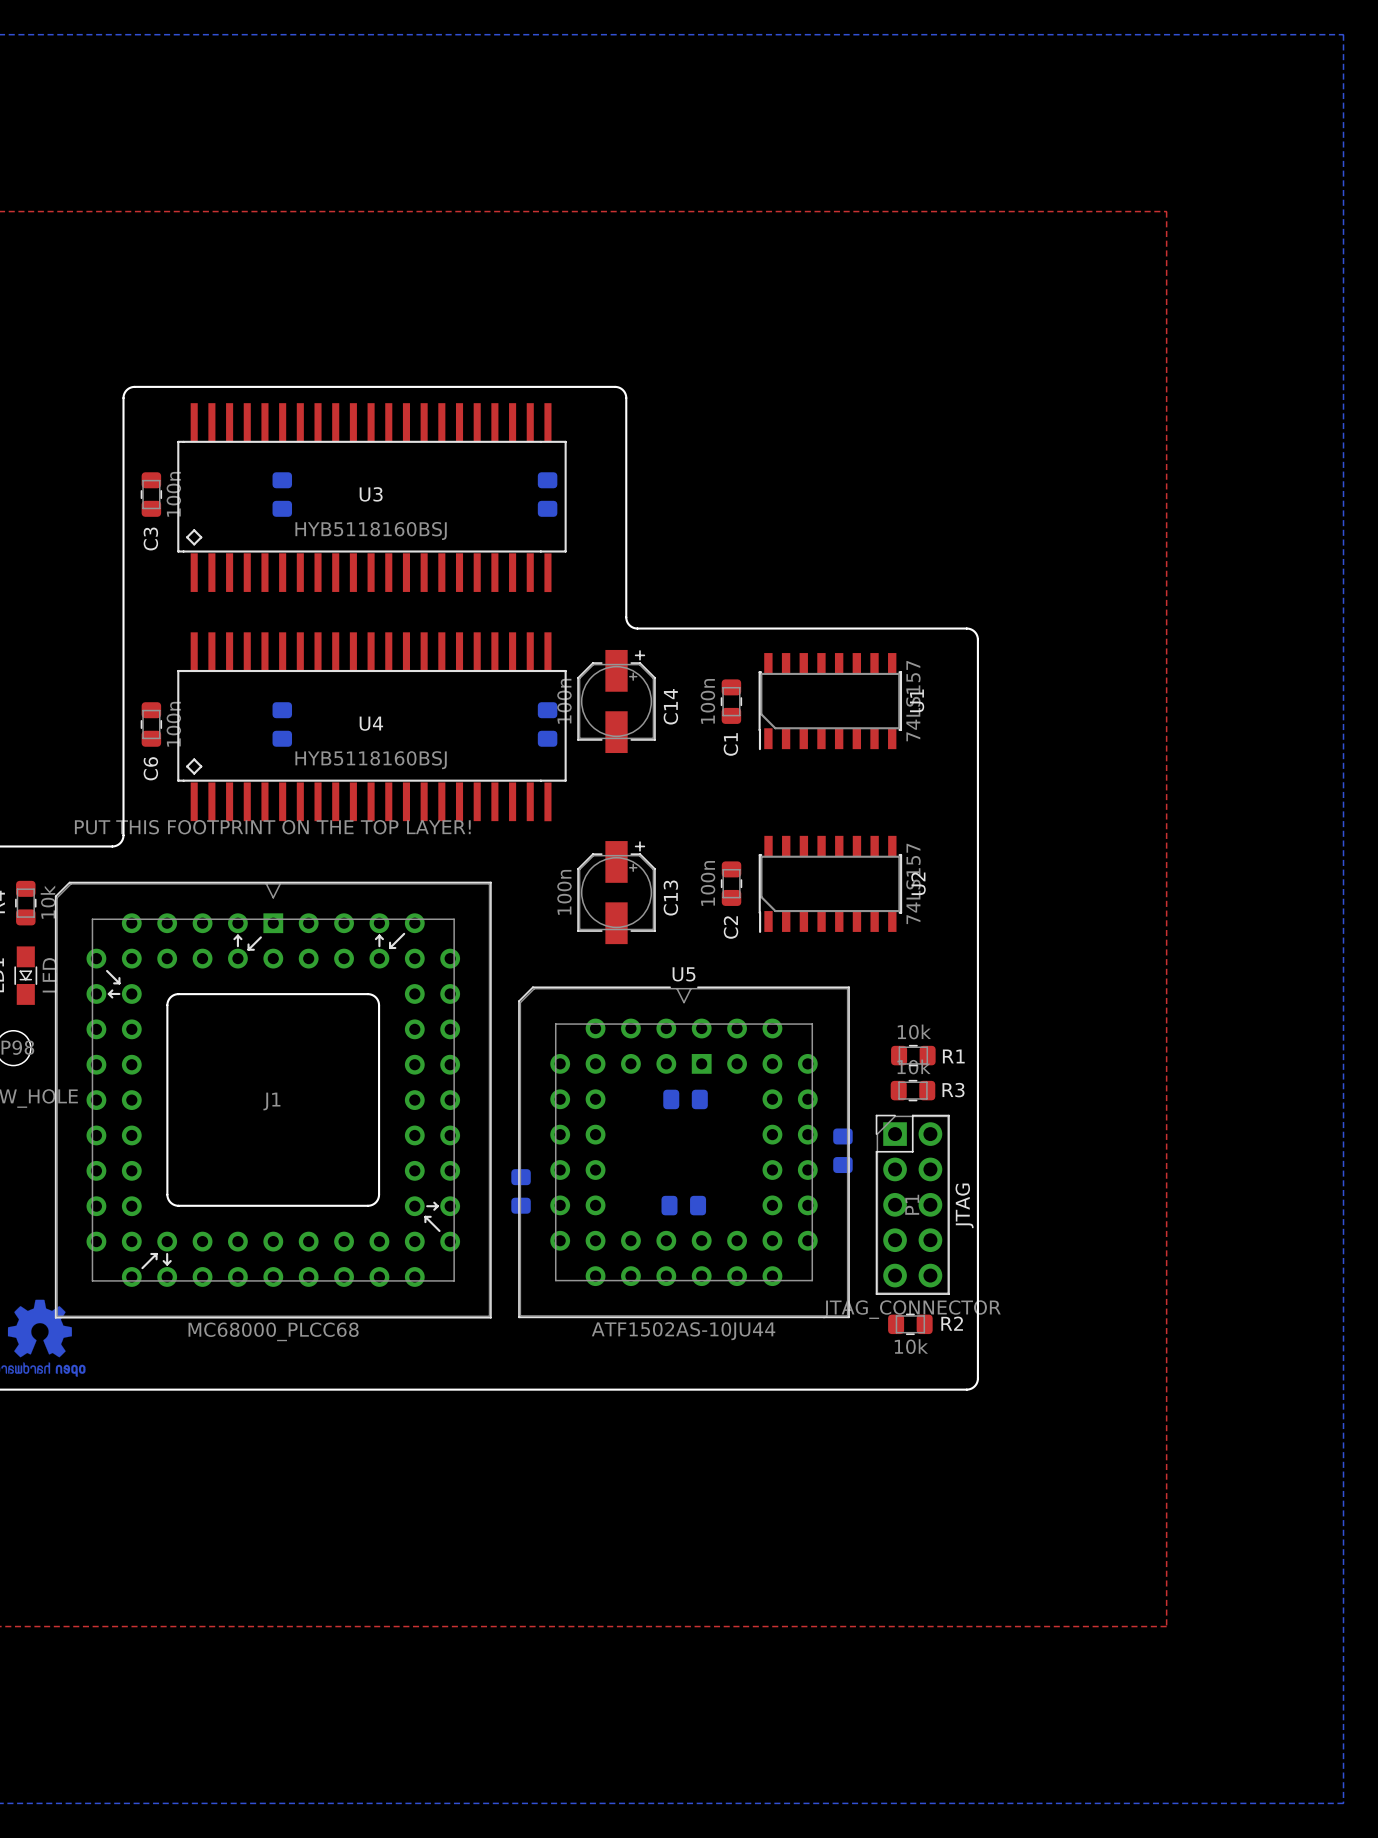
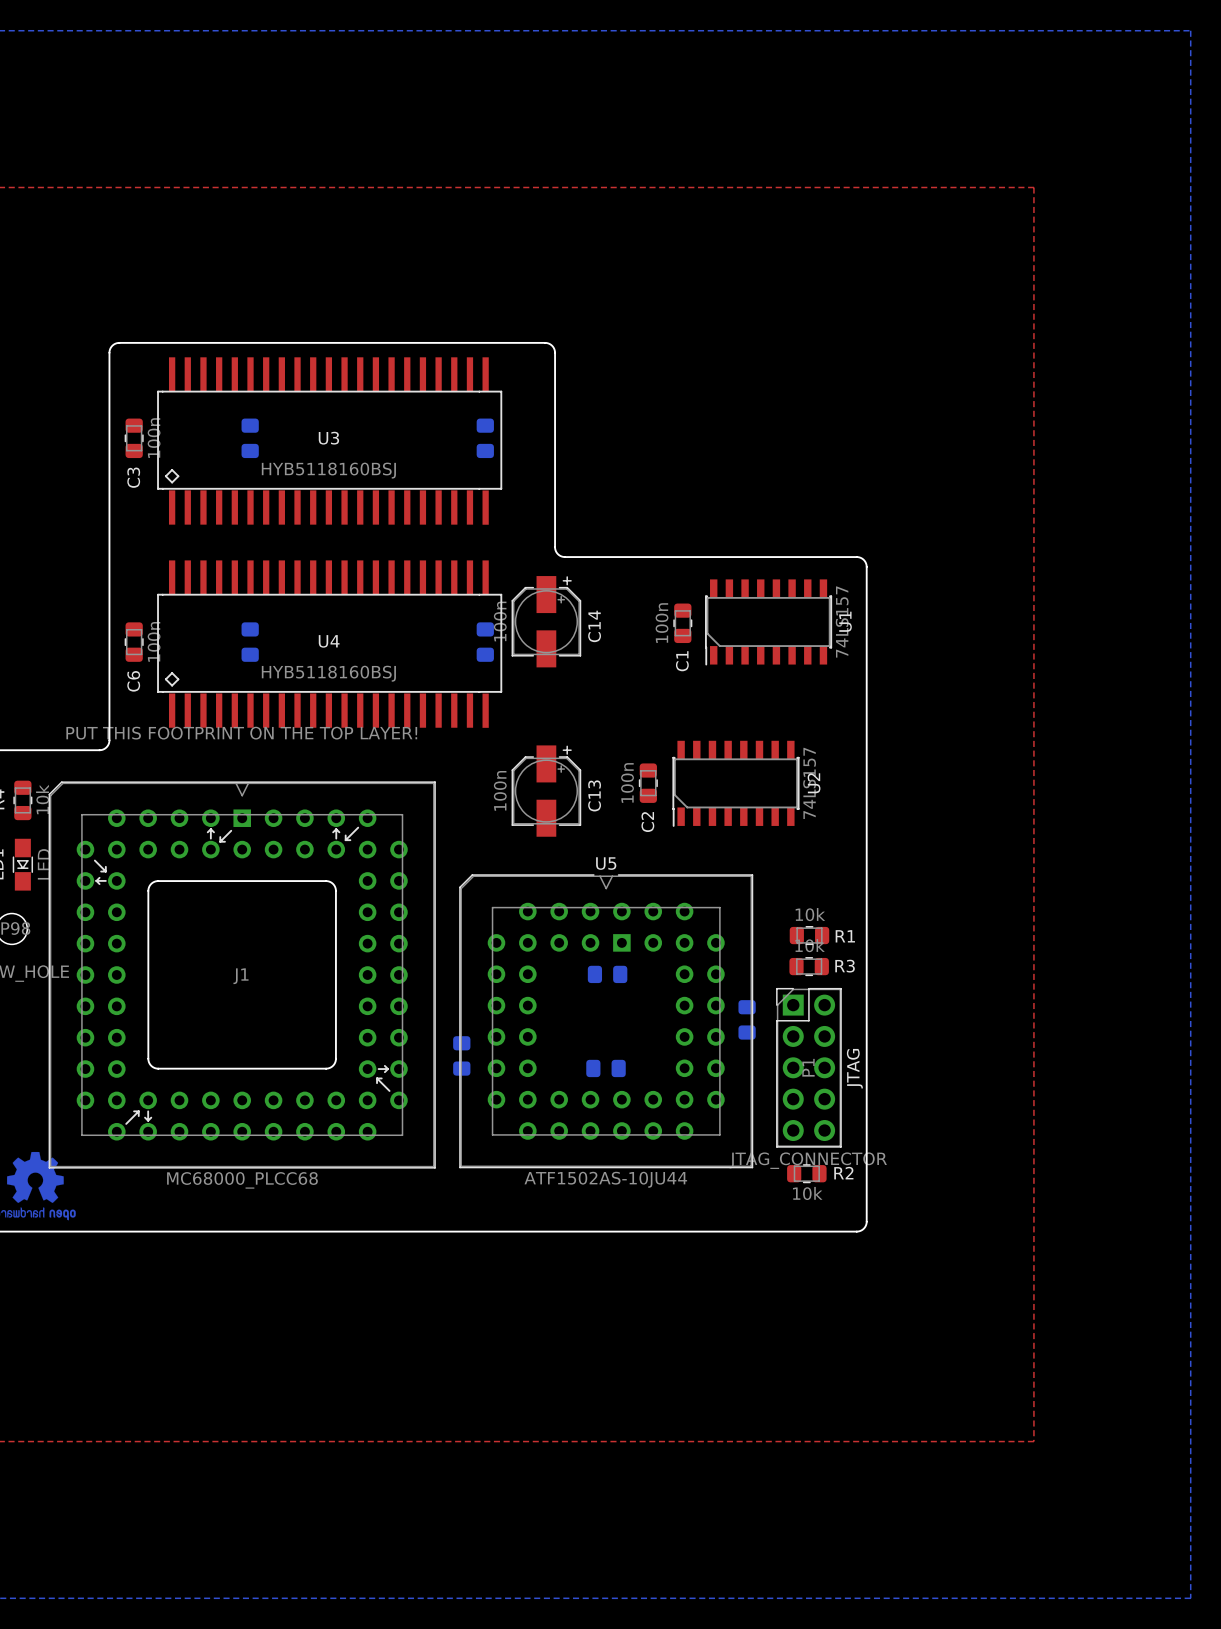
C1 position: (731, 701) -> (682, 623)
U1 position: (830, 701) -> (768, 622)

